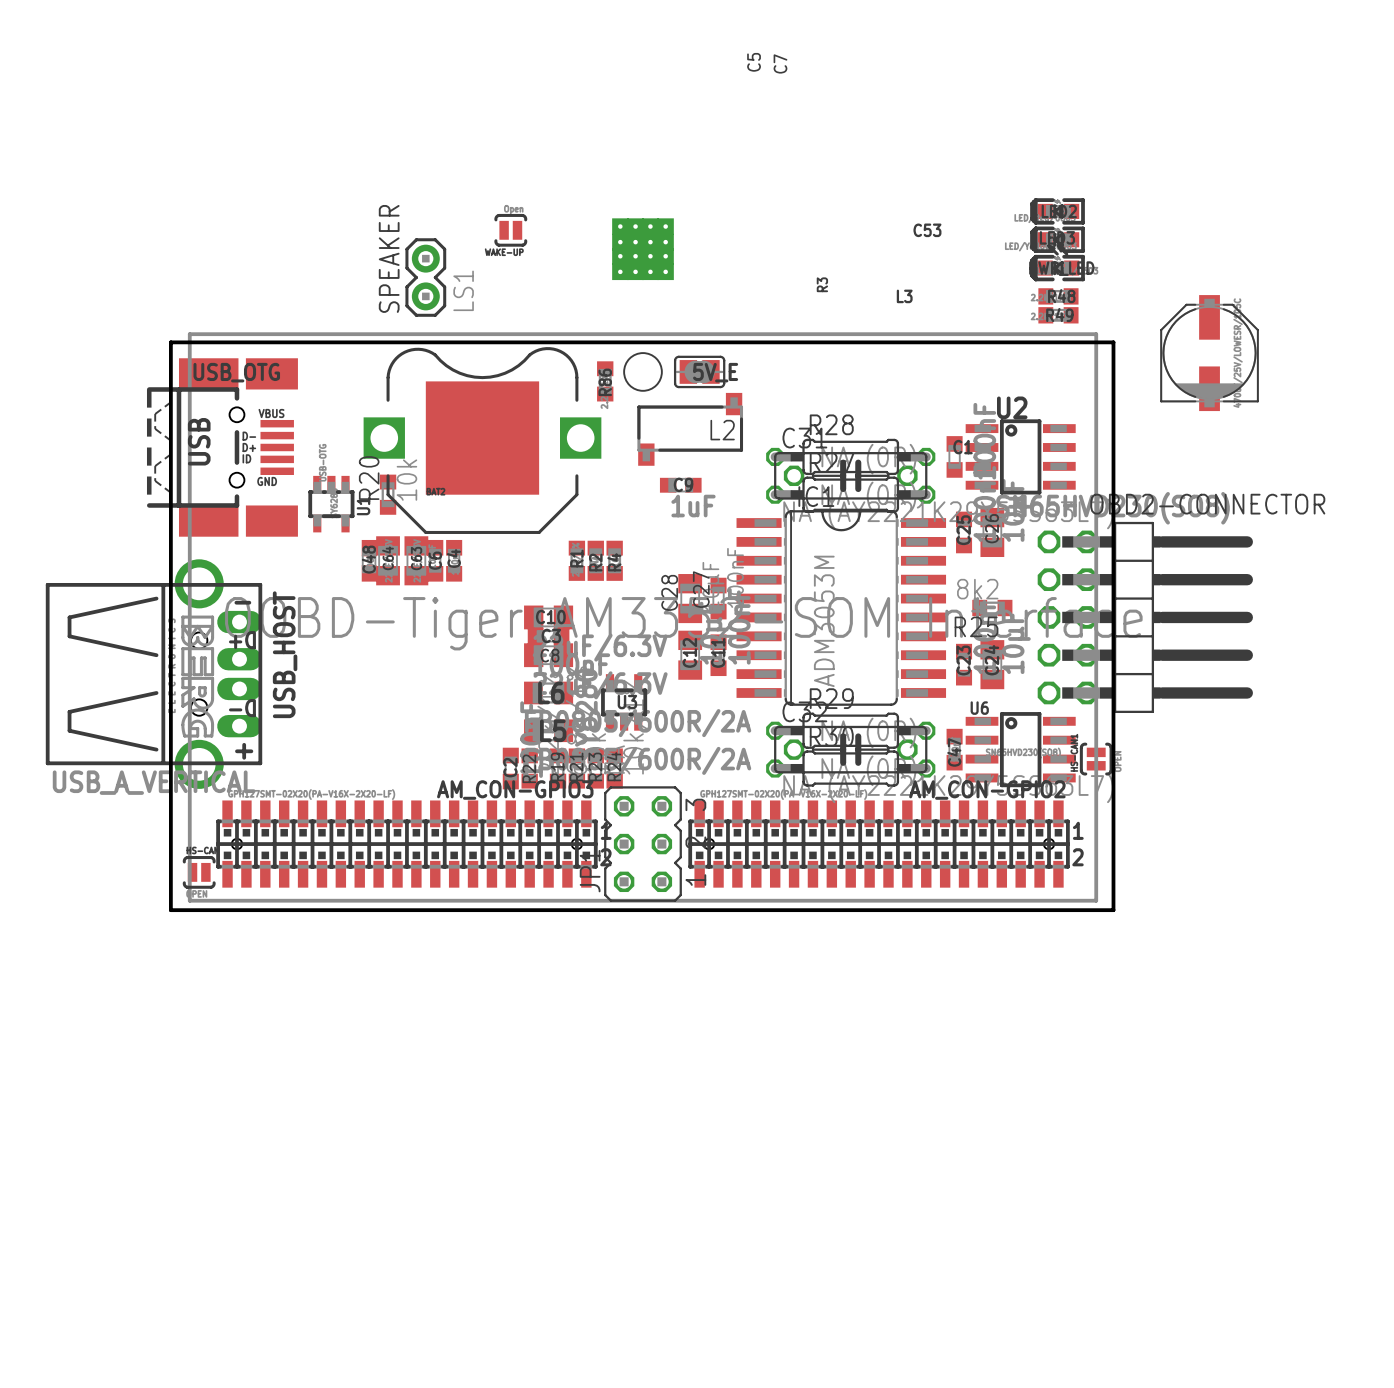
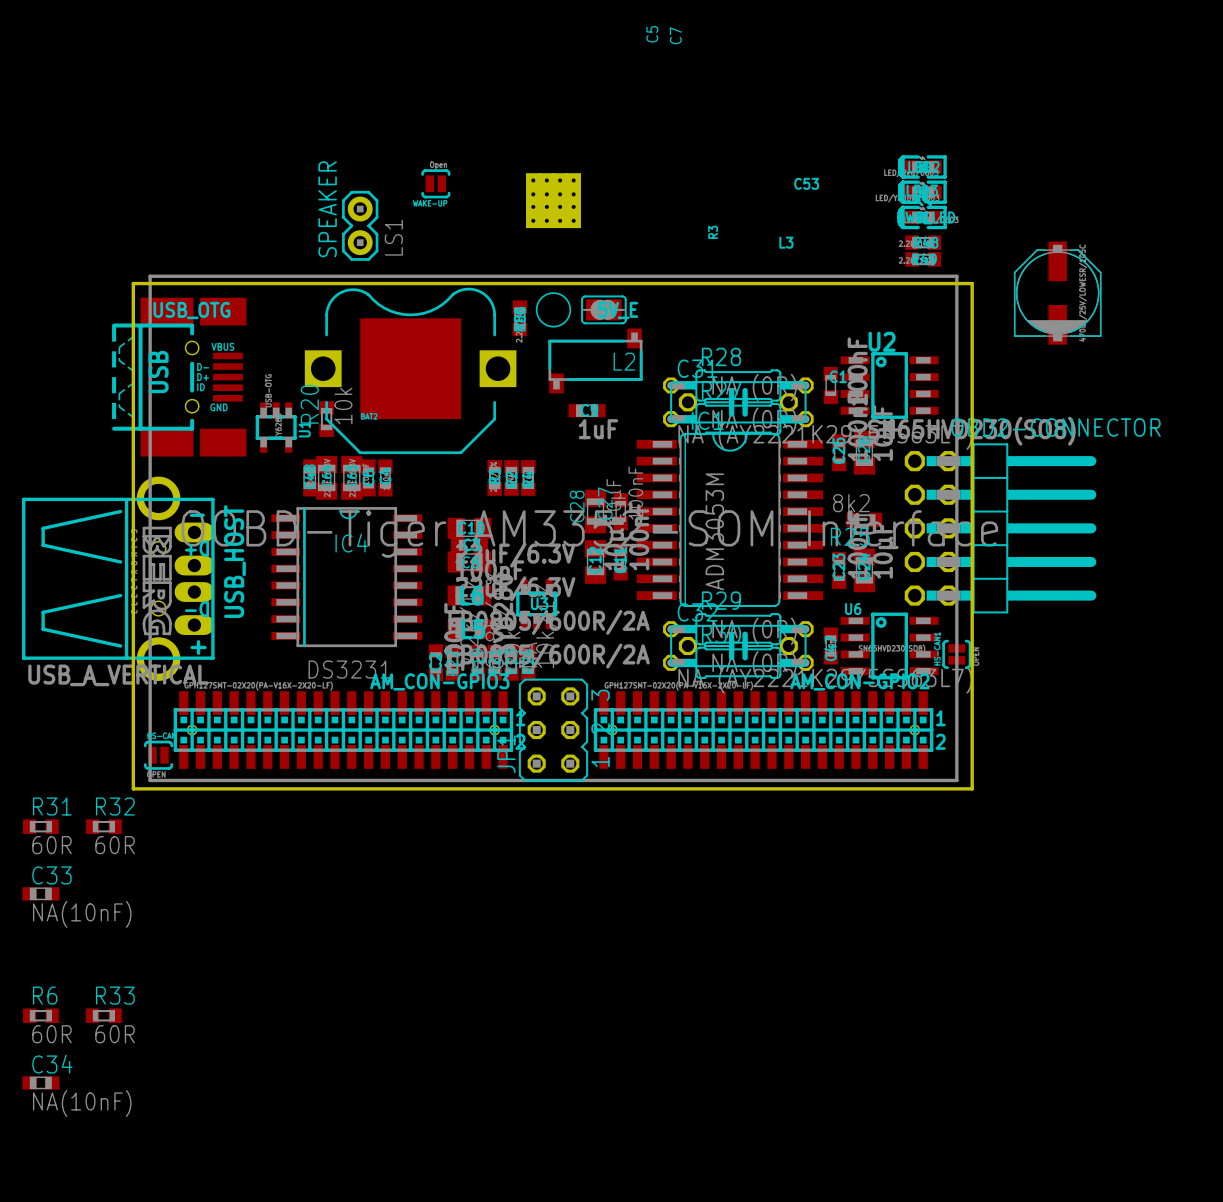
IC4: none -> DS3231 (346, 577)
R31: none -> 60R (40, 826)
R32: none -> 60R (103, 826)
C33: none -> NA(10nF) (40, 893)
R6: none -> 60R (40, 1015)
R33: none -> 60R (103, 1015)
C34: none -> NA(10nF) (40, 1082)

